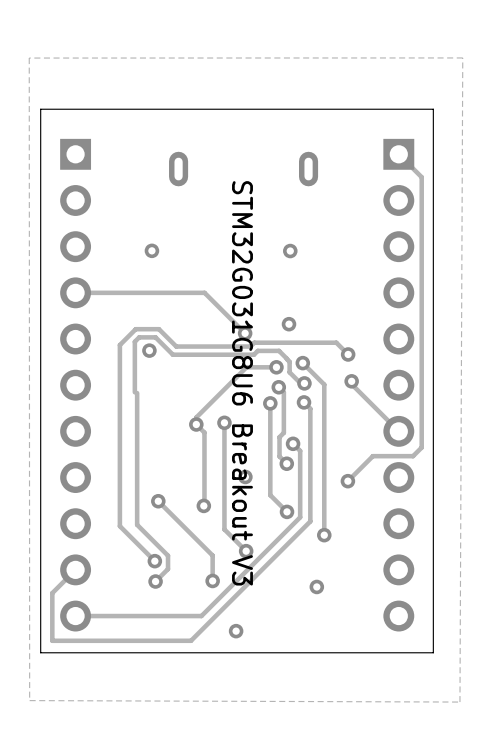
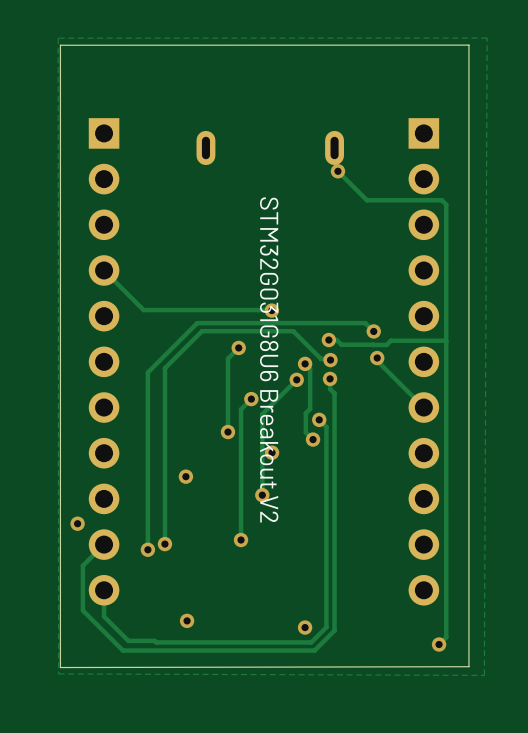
board edge: (433, 109) (433, 652) (40, 652) (40, 109) (433, 109) -> (468, 45) (468, 666) (60, 667) (60, 45) (468, 45)
track: (398, 154) (421, 177) (421, 447) (413, 456) (372, 456) (347, 481) -> none
track: none -> (337, 171) (366, 200) (441, 200) (446, 204) (446, 341)
via: (151, 250) -> none
via position: (290, 251) -> (337, 171)
track: (75, 292) (204, 292) (245, 333) -> (104, 270) (143, 310) (268, 310)
via: (289, 324) -> none
track: (339, 346) (336, 342) (254, 342) (250, 346) (176, 346) (158, 329) (135, 329) (119, 345) (119, 395) -> (365, 323) (197, 323) (147, 372)
via: (149, 350) -> none
track: none -> (326, 340) (336, 340) (341, 344) (373, 344)
track: (302, 363) (324, 384) (324, 535) -> none
track: none -> (446, 341) (390, 340) (386, 344) (373, 344)
track: none -> (446, 341) (446, 637) (439, 644)
track: (276, 367) (246, 367) (196, 417) (196, 424) (204, 432) (203, 505) -> none
via: (276, 367) -> none
track: none -> (238, 347) (227, 358) (227, 432)
via: none -> (238, 347)
track: none -> (331, 358) (320, 358) (293, 331) (202, 331) (164, 369)
text: STM32G031G8U6 Breakout V3 (242, 383) -> STM32G031G8U6 Breakout V2 (269, 359)
track: (304, 383) (300, 383) (289, 372) (289, 361) (279, 350) (257, 350) (253, 354) (172, 354) (155, 337) (139, 337) (134, 341) (134, 392) -> none
track: (304, 402) (310, 408) (310, 521) (191, 640) (52, 640) (52, 593) (54, 591) -> (330, 378) (330, 389) (334, 393) (334, 630) (314, 650) (122, 650) (82, 610) (82, 565)
track: (270, 403) (270, 495) (287, 511) -> (296, 379) (262, 414) (262, 495)
track: (224, 422) (224, 529) (246, 551) -> (251, 399) (241, 409) (241, 540)
via: (196, 424) -> none
track: (300, 450) (300, 517) (201, 616) (75, 616) -> (326, 427) (326, 627) (311, 642) (128, 640) (104, 616) (104, 590)
via: none -> (227, 432)
via: (347, 481) -> none
track: (158, 501) (212, 555) (212, 580) -> none
via: (203, 505) -> none
via: (287, 511) -> none
via: none -> (262, 495)
track: (137, 524) (168, 555) (168, 569) (155, 581) -> (164, 500) (164, 544)
track: (119, 526) (154, 561) -> (147, 501) (147, 549)
via: (324, 535) -> none
via: none -> (77, 523)
via: (246, 551) -> none
via: (154, 561) -> none
via: none -> (164, 544)
via: none -> (147, 549)
via position: (212, 580) -> (241, 540)
via: (155, 581) -> none
via: (316, 586) -> none
via: (236, 631) -> none
via: none -> (187, 620)
via: none -> (305, 627)
via: none -> (439, 644)

